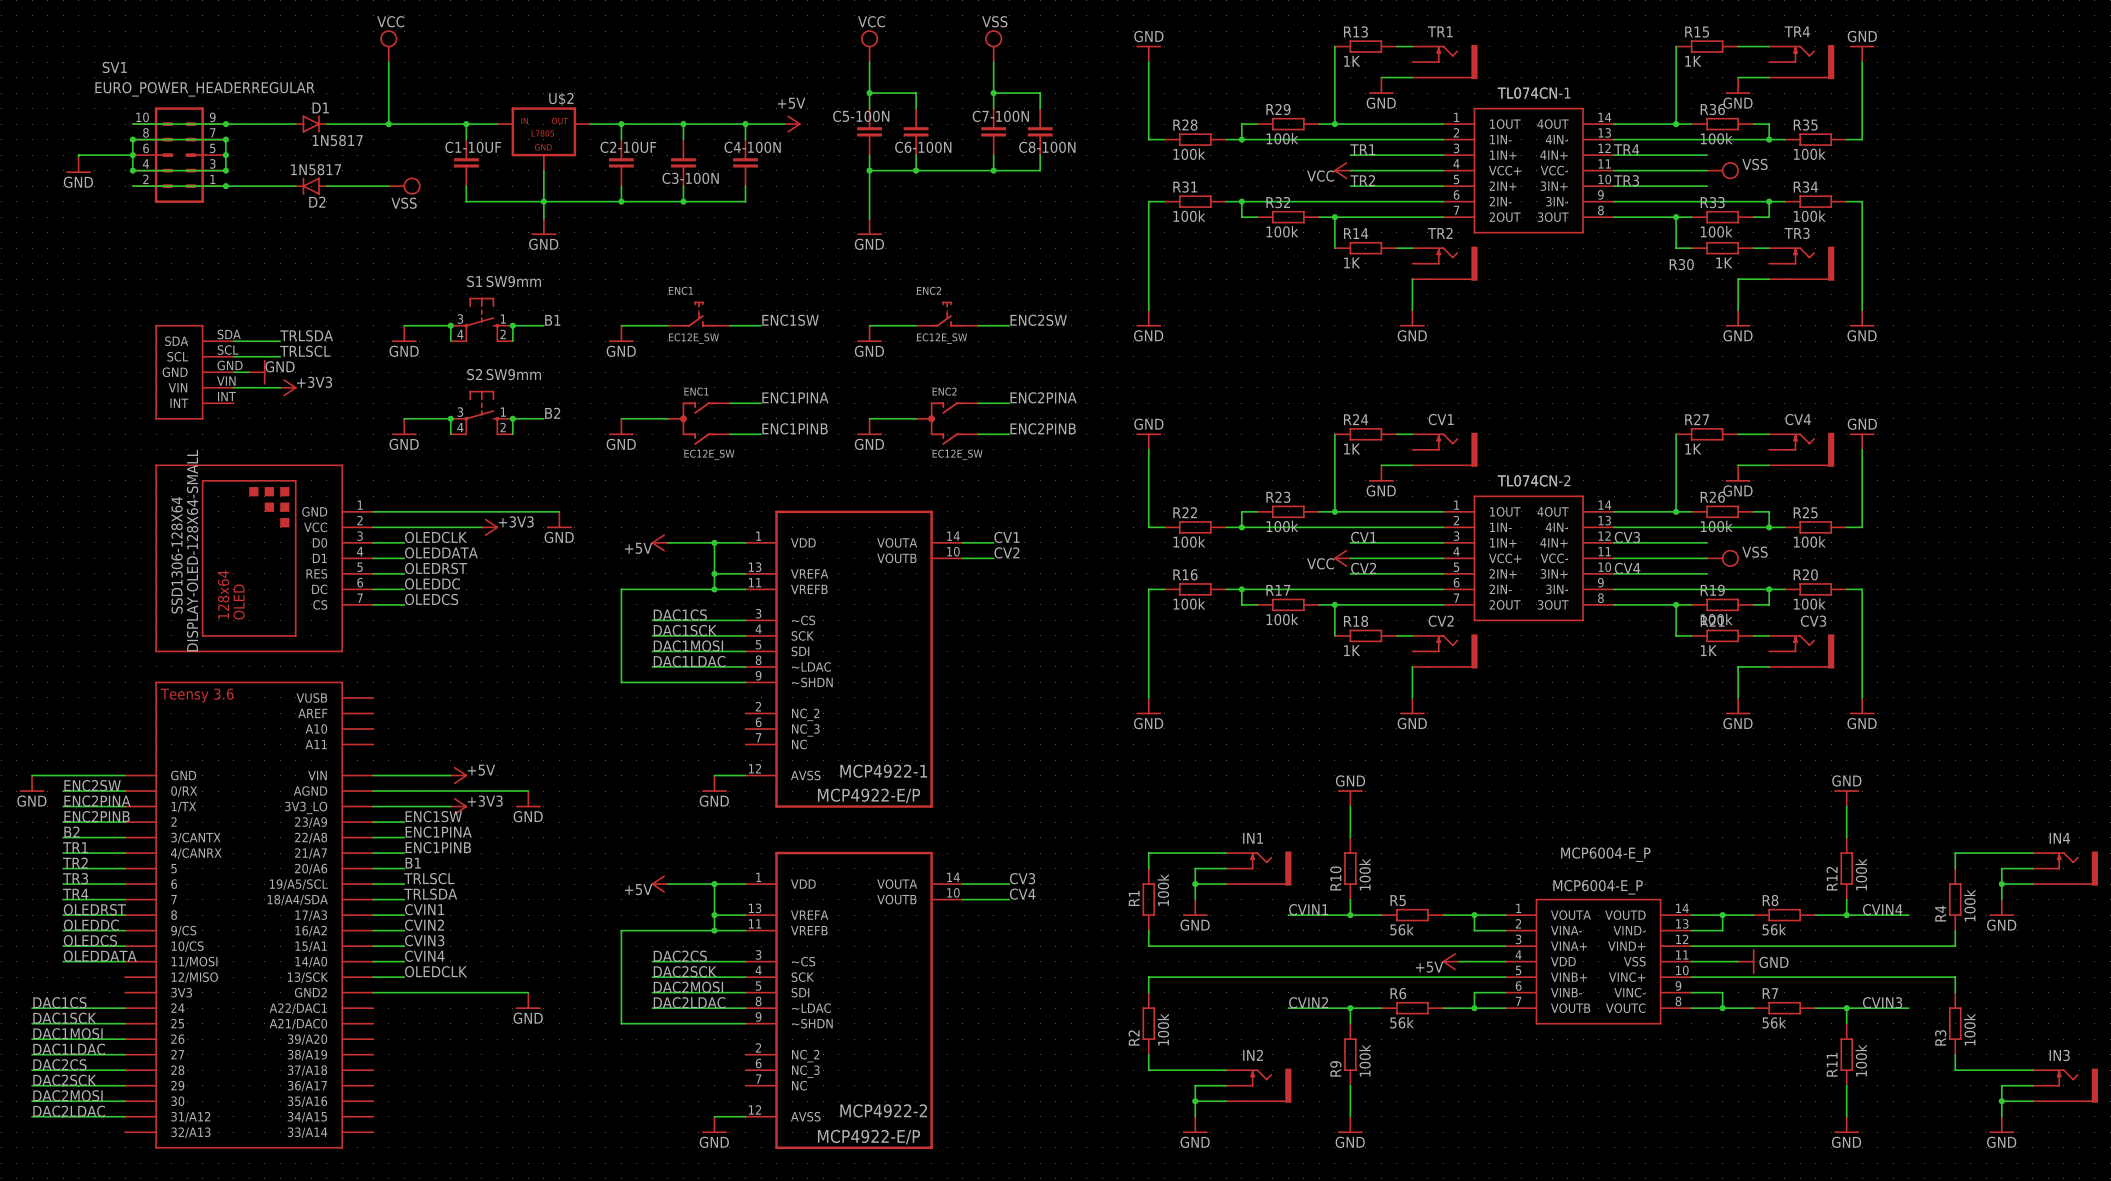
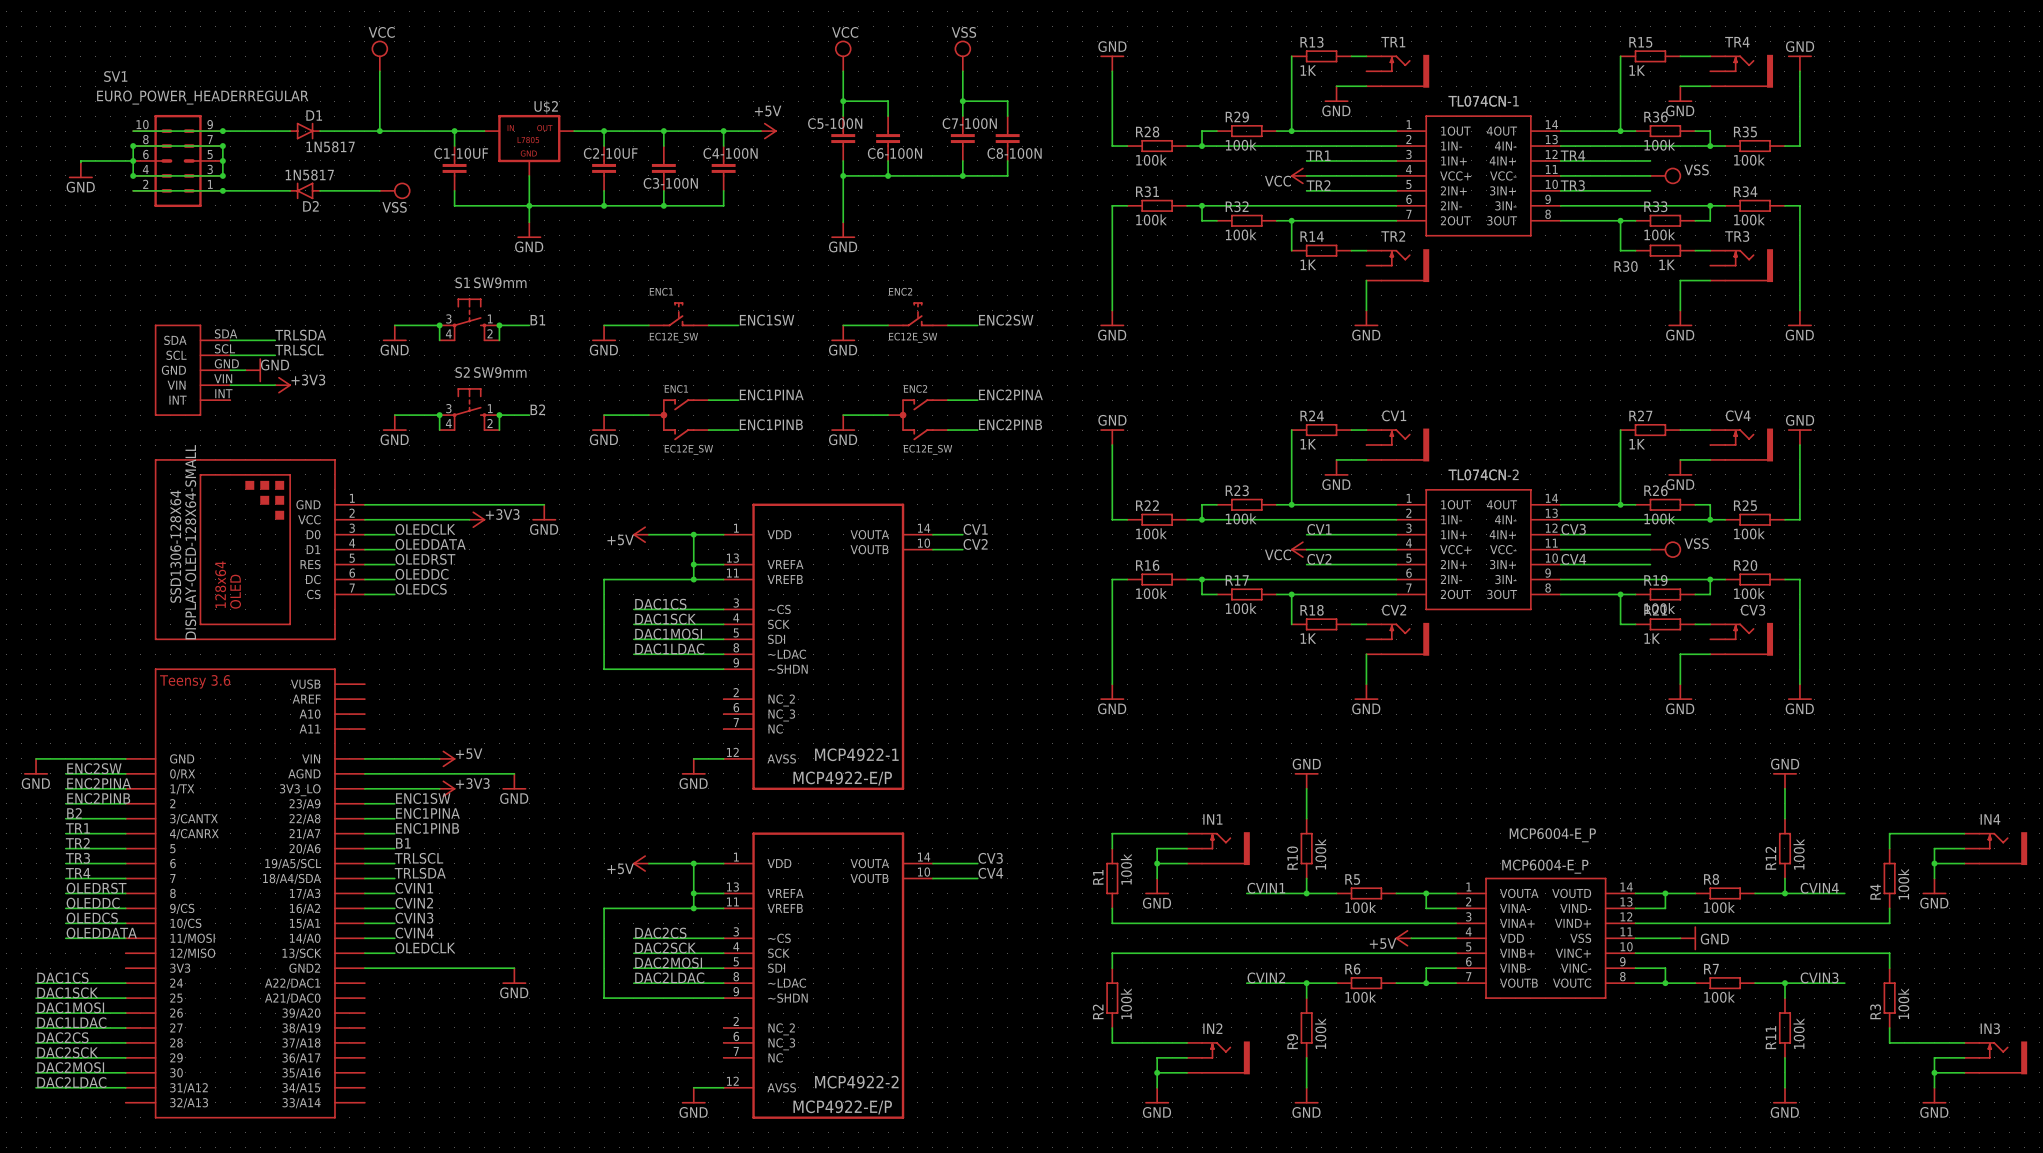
R5 value: 56k (1402, 929) -> 100k (1360, 907)
R8 value: 56k (1774, 929) -> 100k (1719, 907)
R6 value: 56k (1402, 1022) -> 100k (1360, 997)
R7 value: 56k (1774, 1022) -> 100k (1719, 997)

